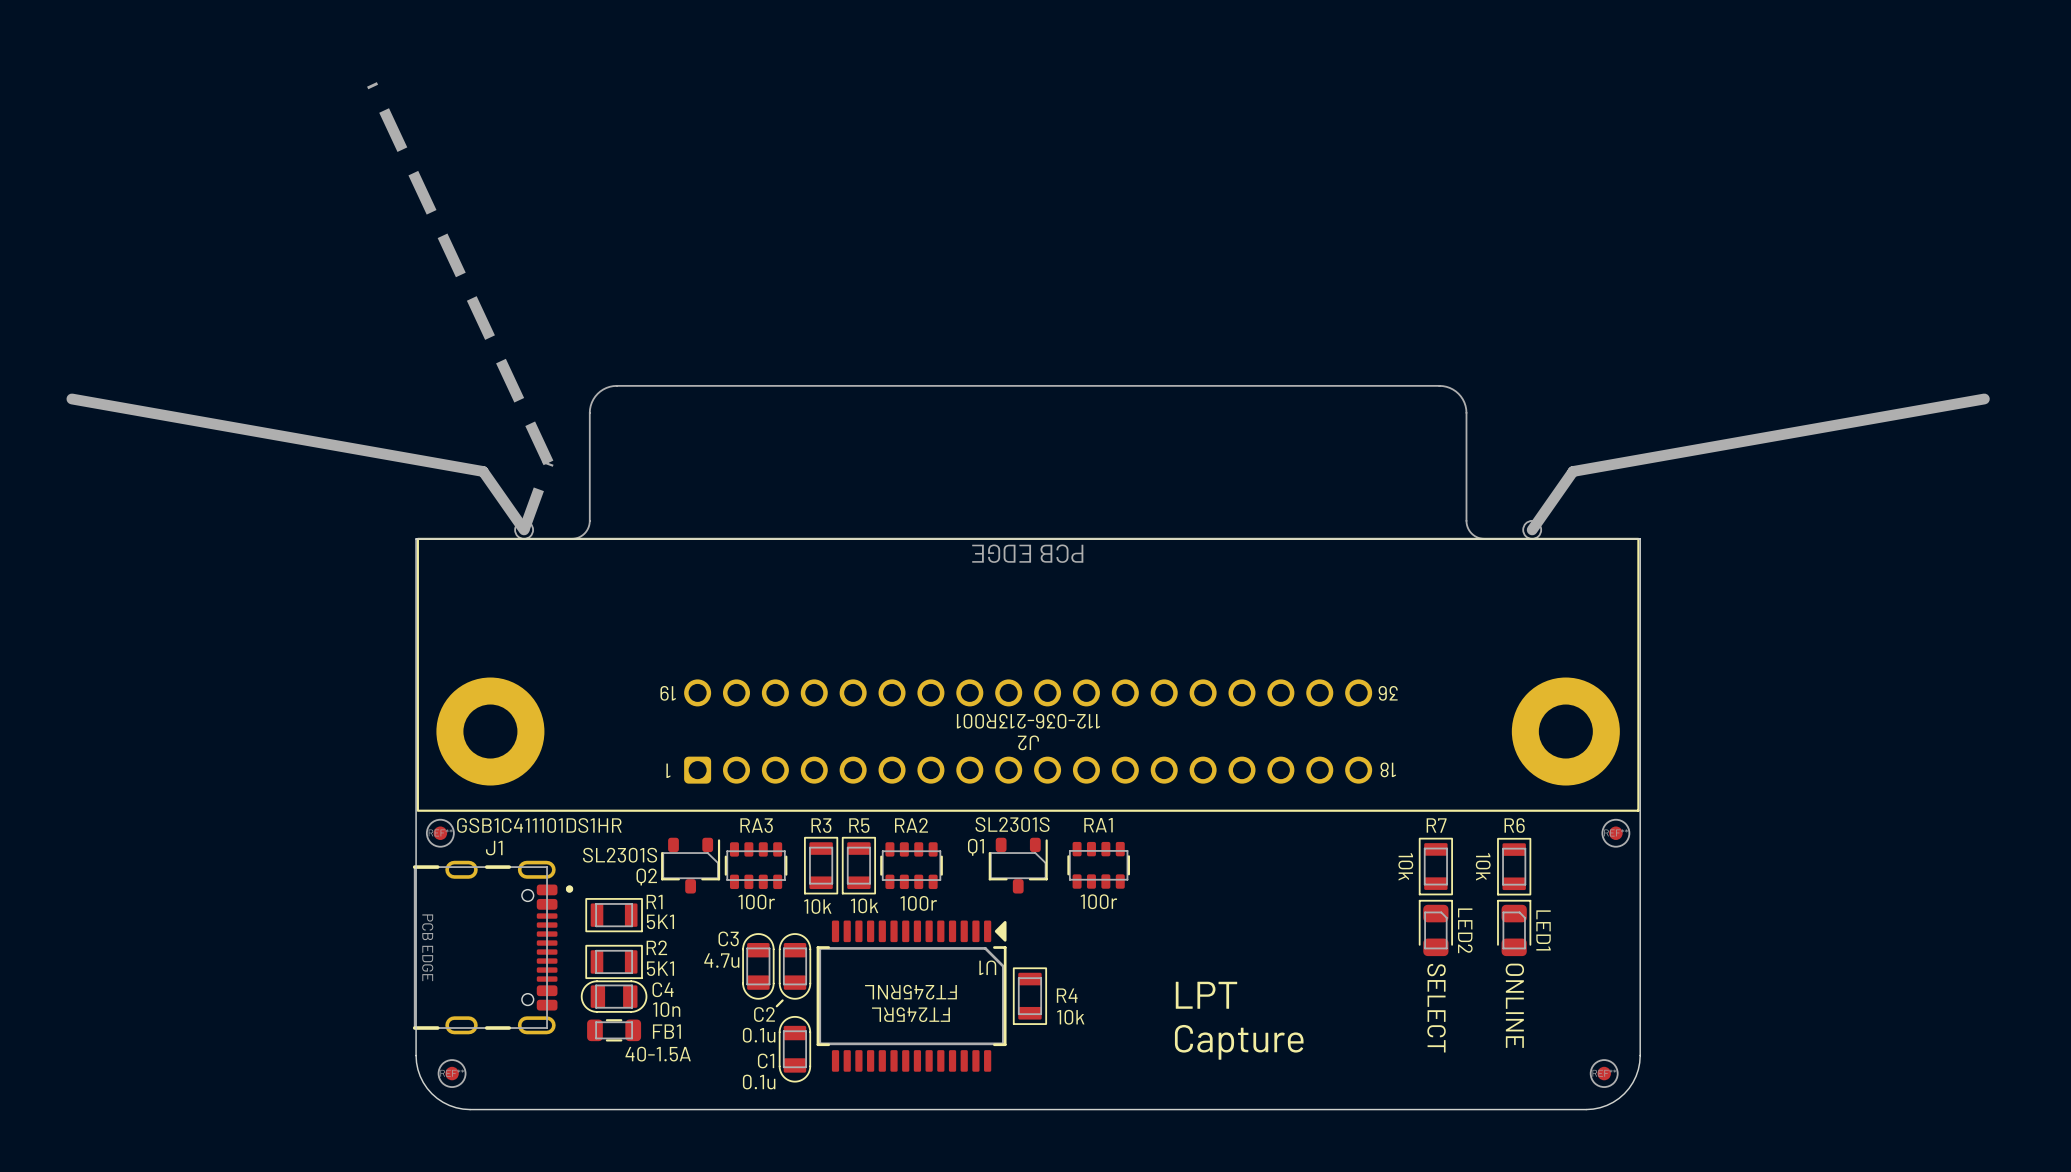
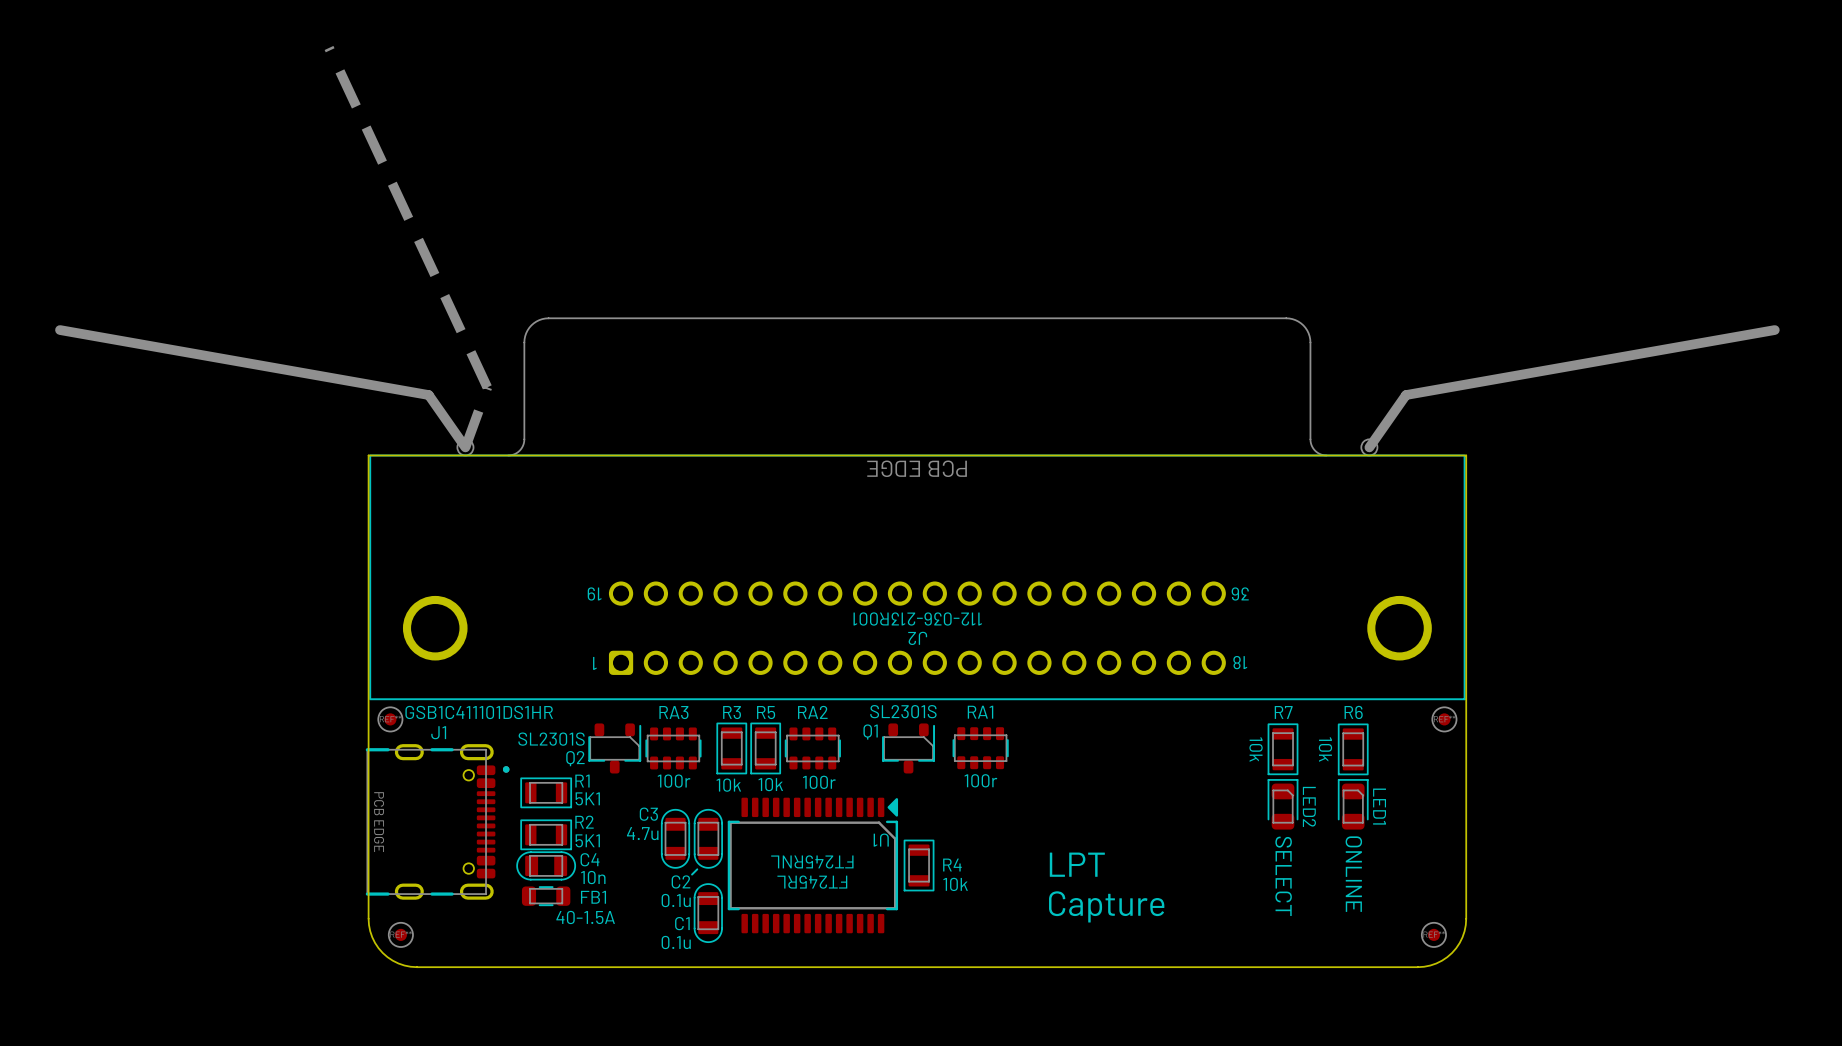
J2 footprint: [66, 79, 1990, 812] -> [55, 43, 1780, 701]

